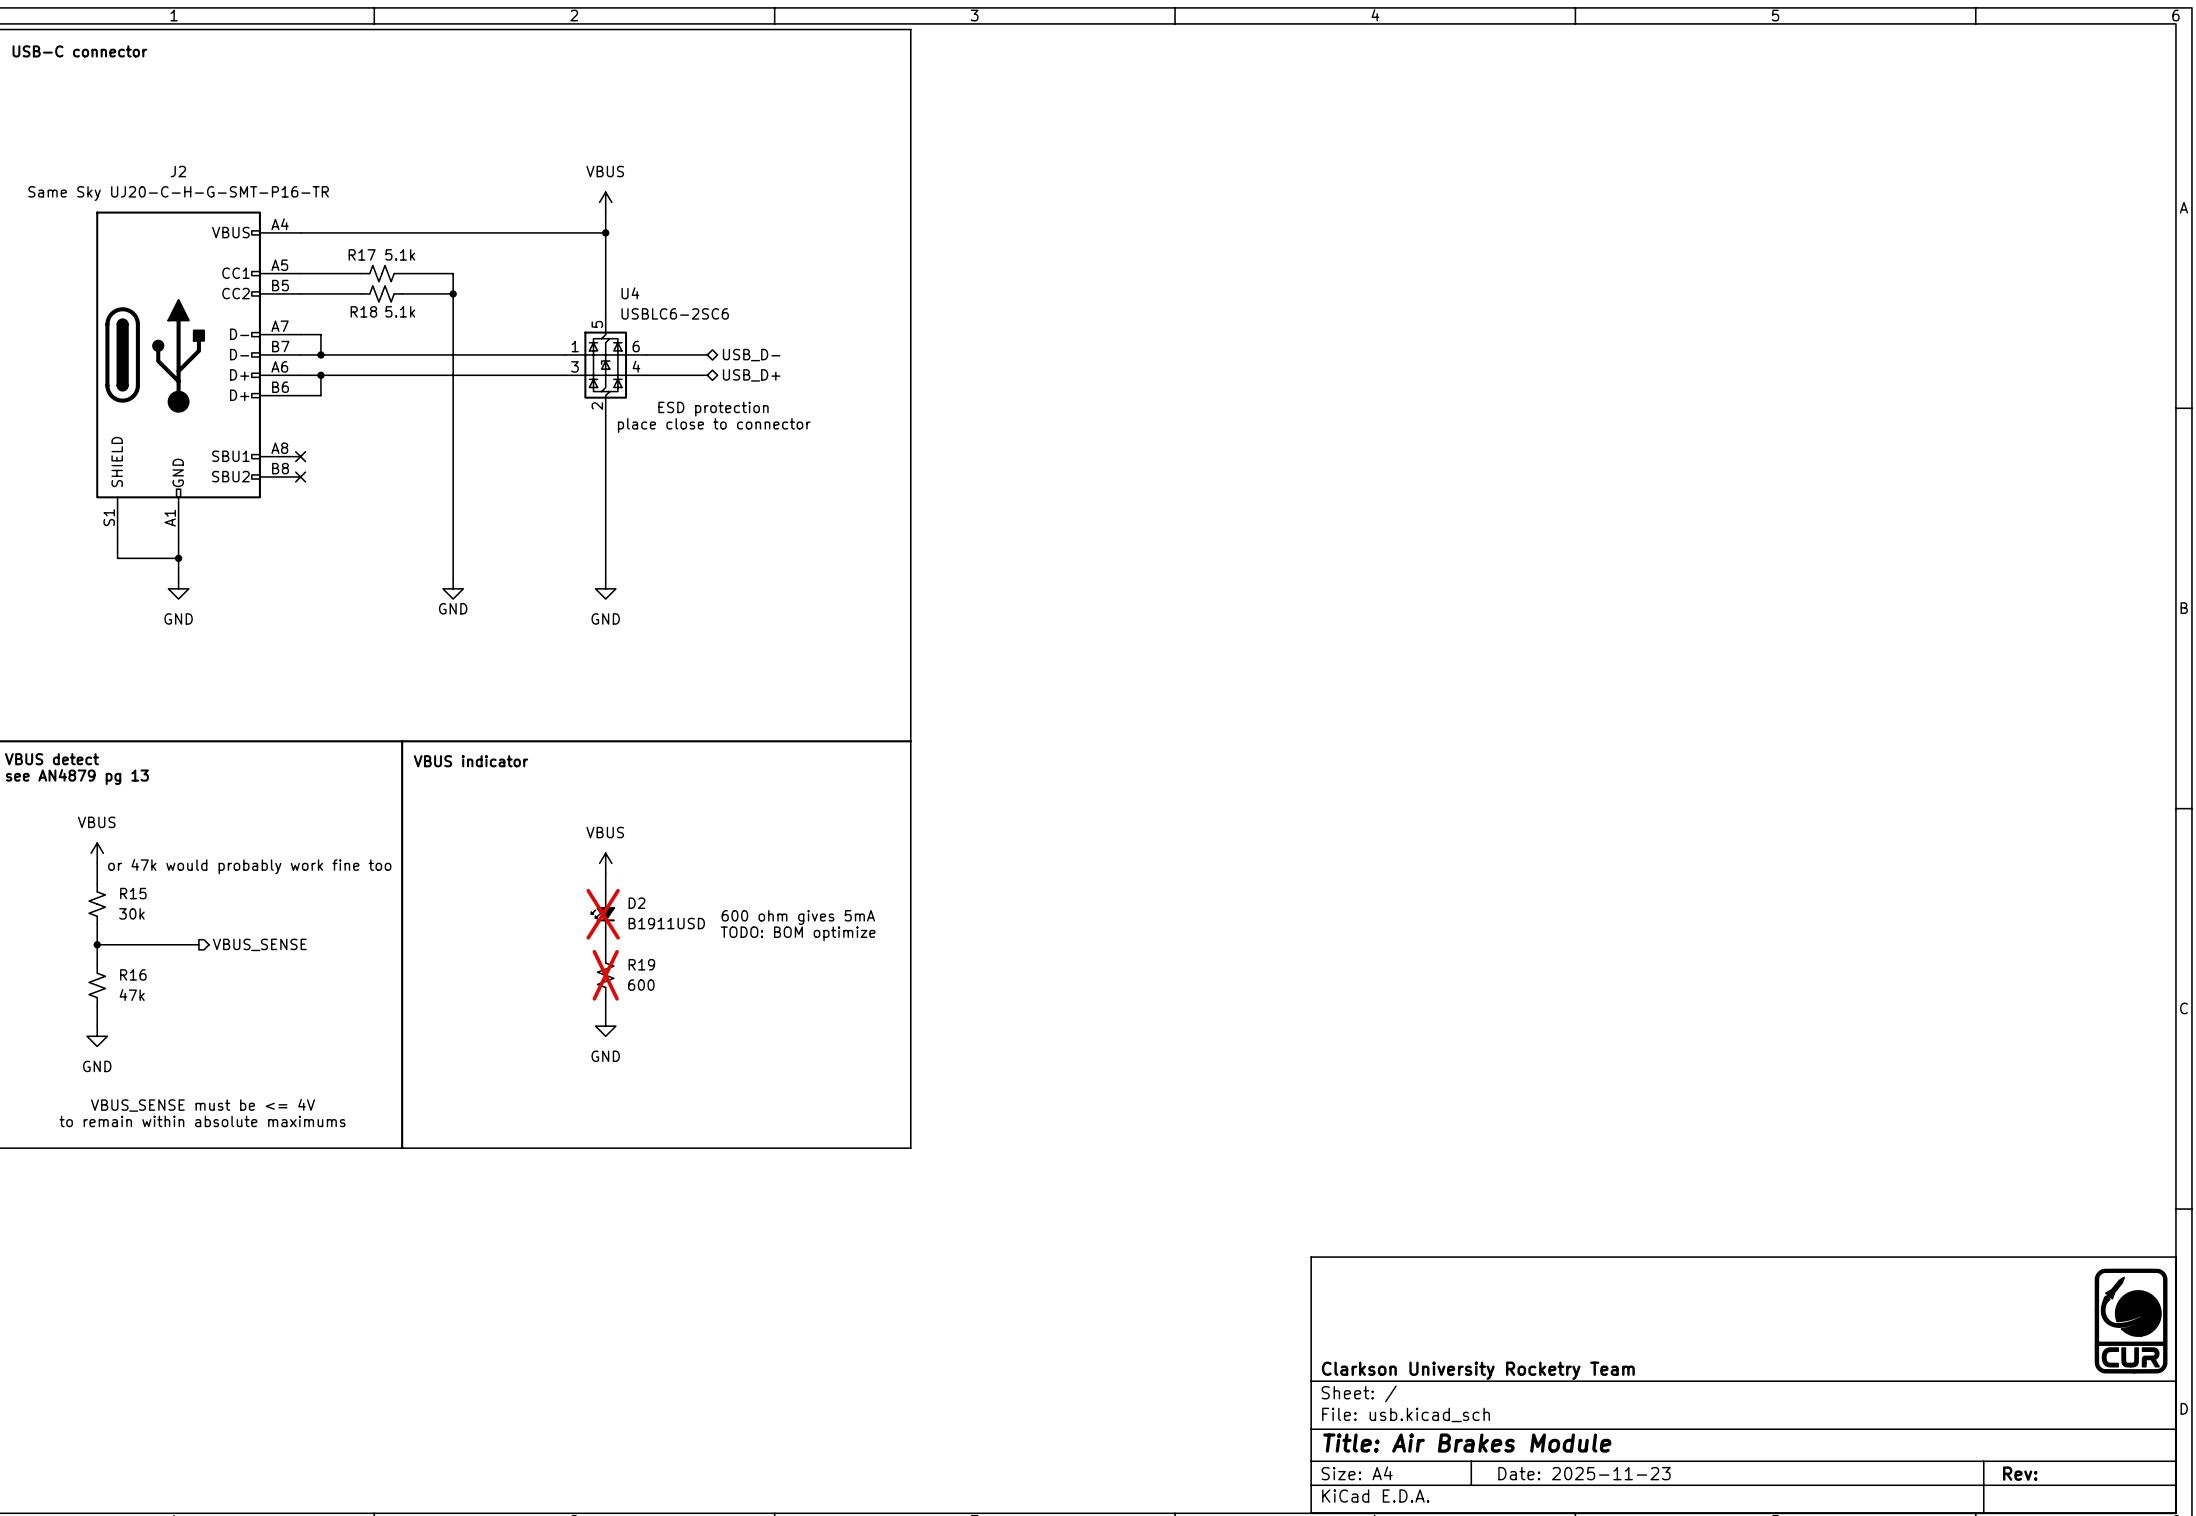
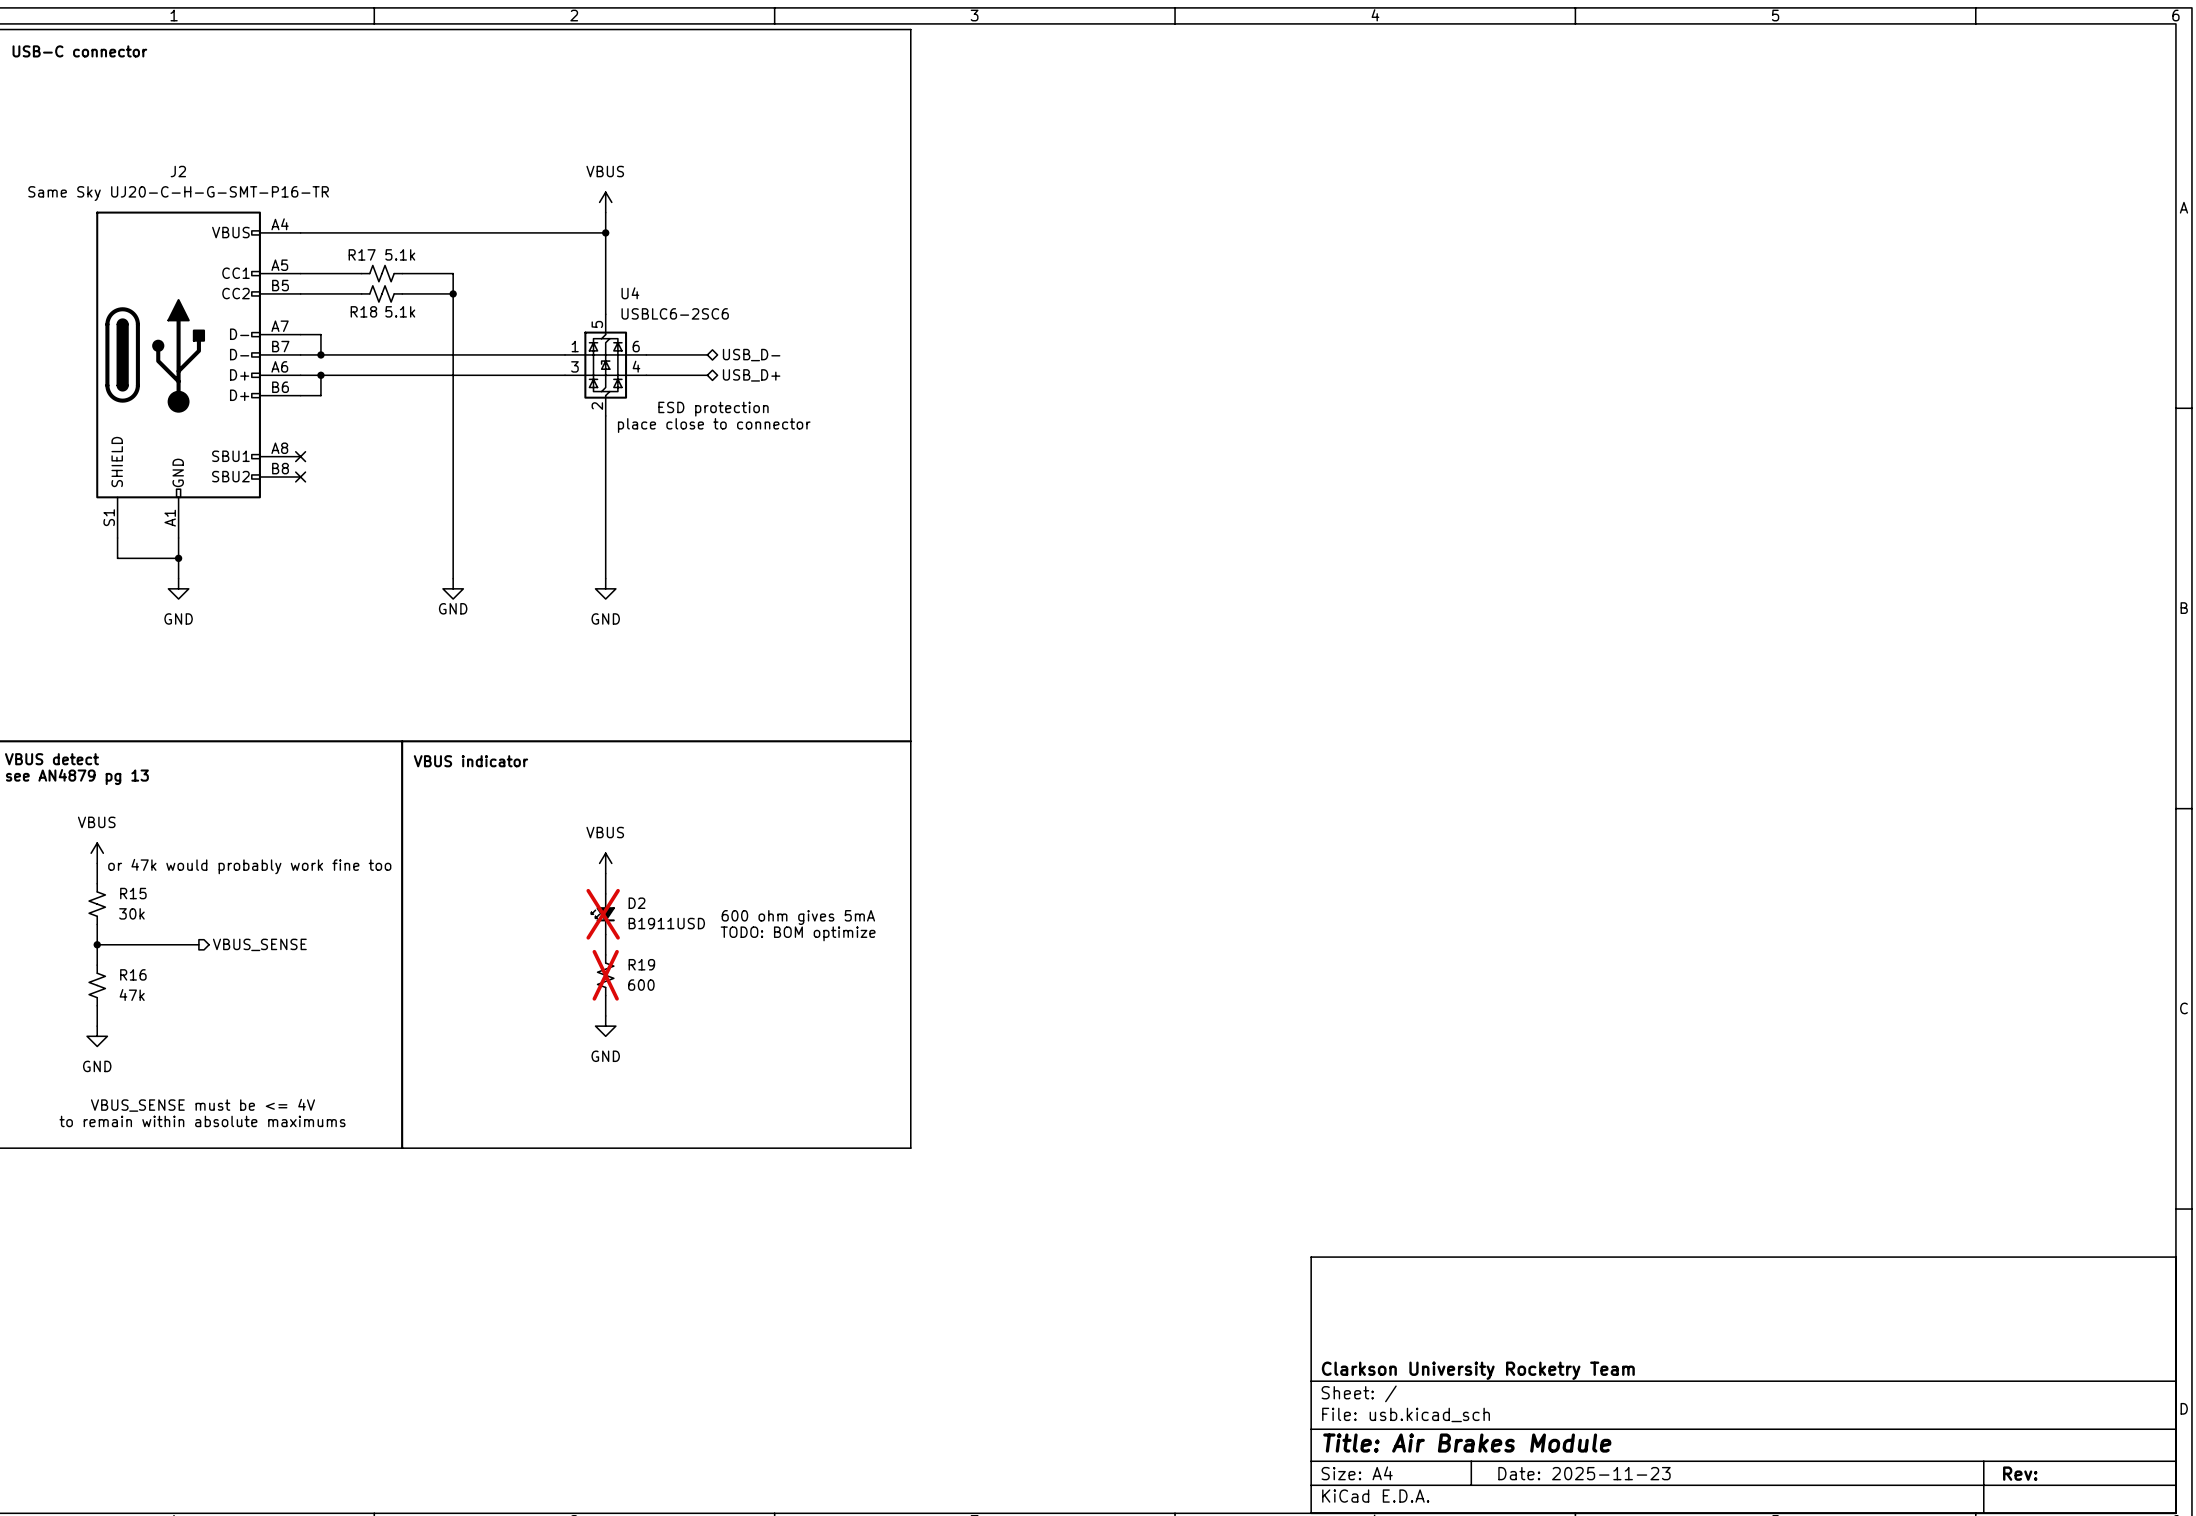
power symbol: (2131, 1321) -> none

